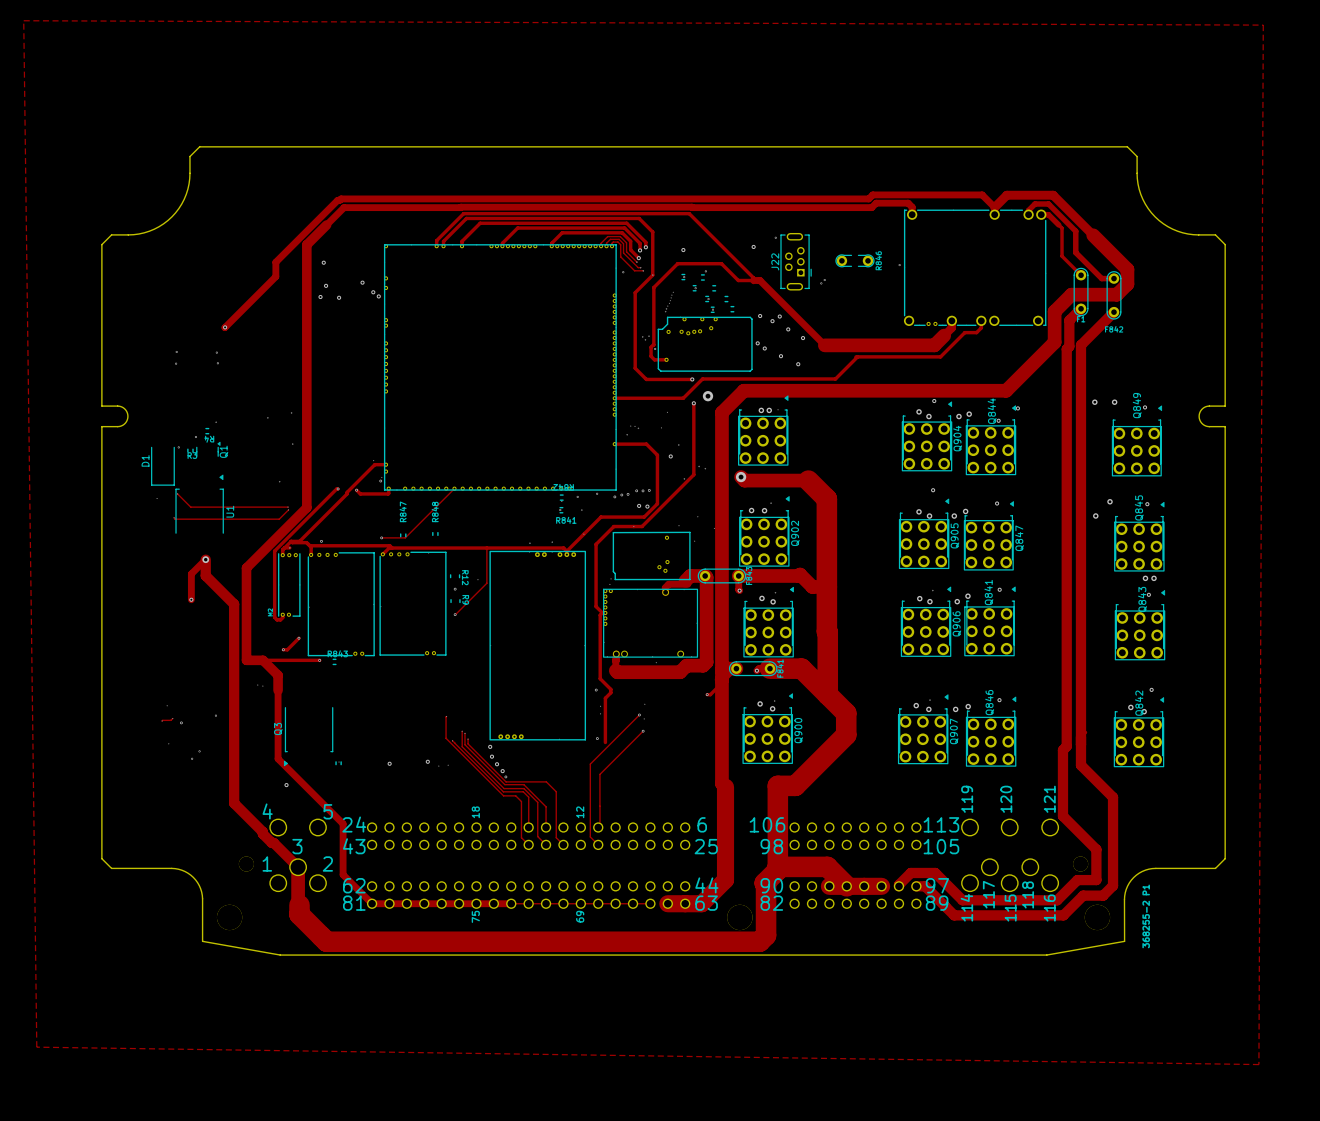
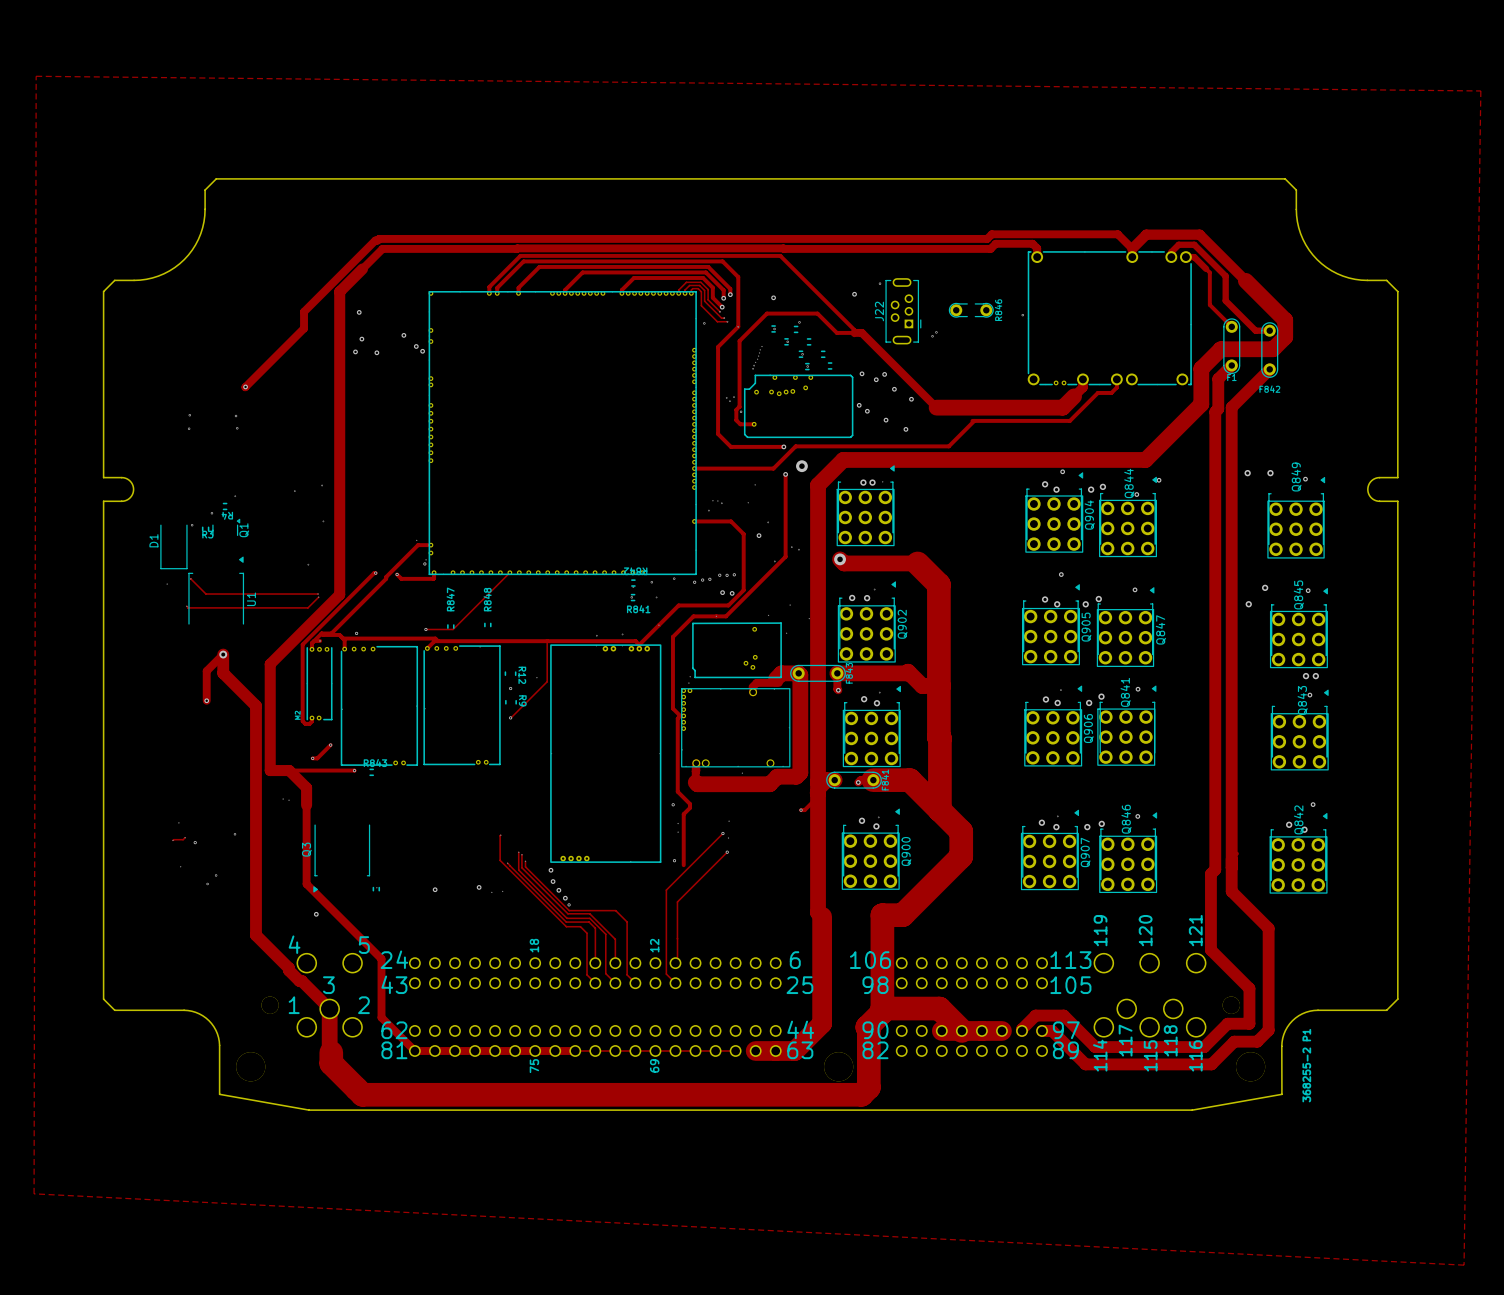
zone outline: (23, 20) (1263, 25) (1258, 1064) (36, 1047) (23, 20) -> (36, 76) (34, 1193) (1464, 1265) (1480, 90) (36, 76)

